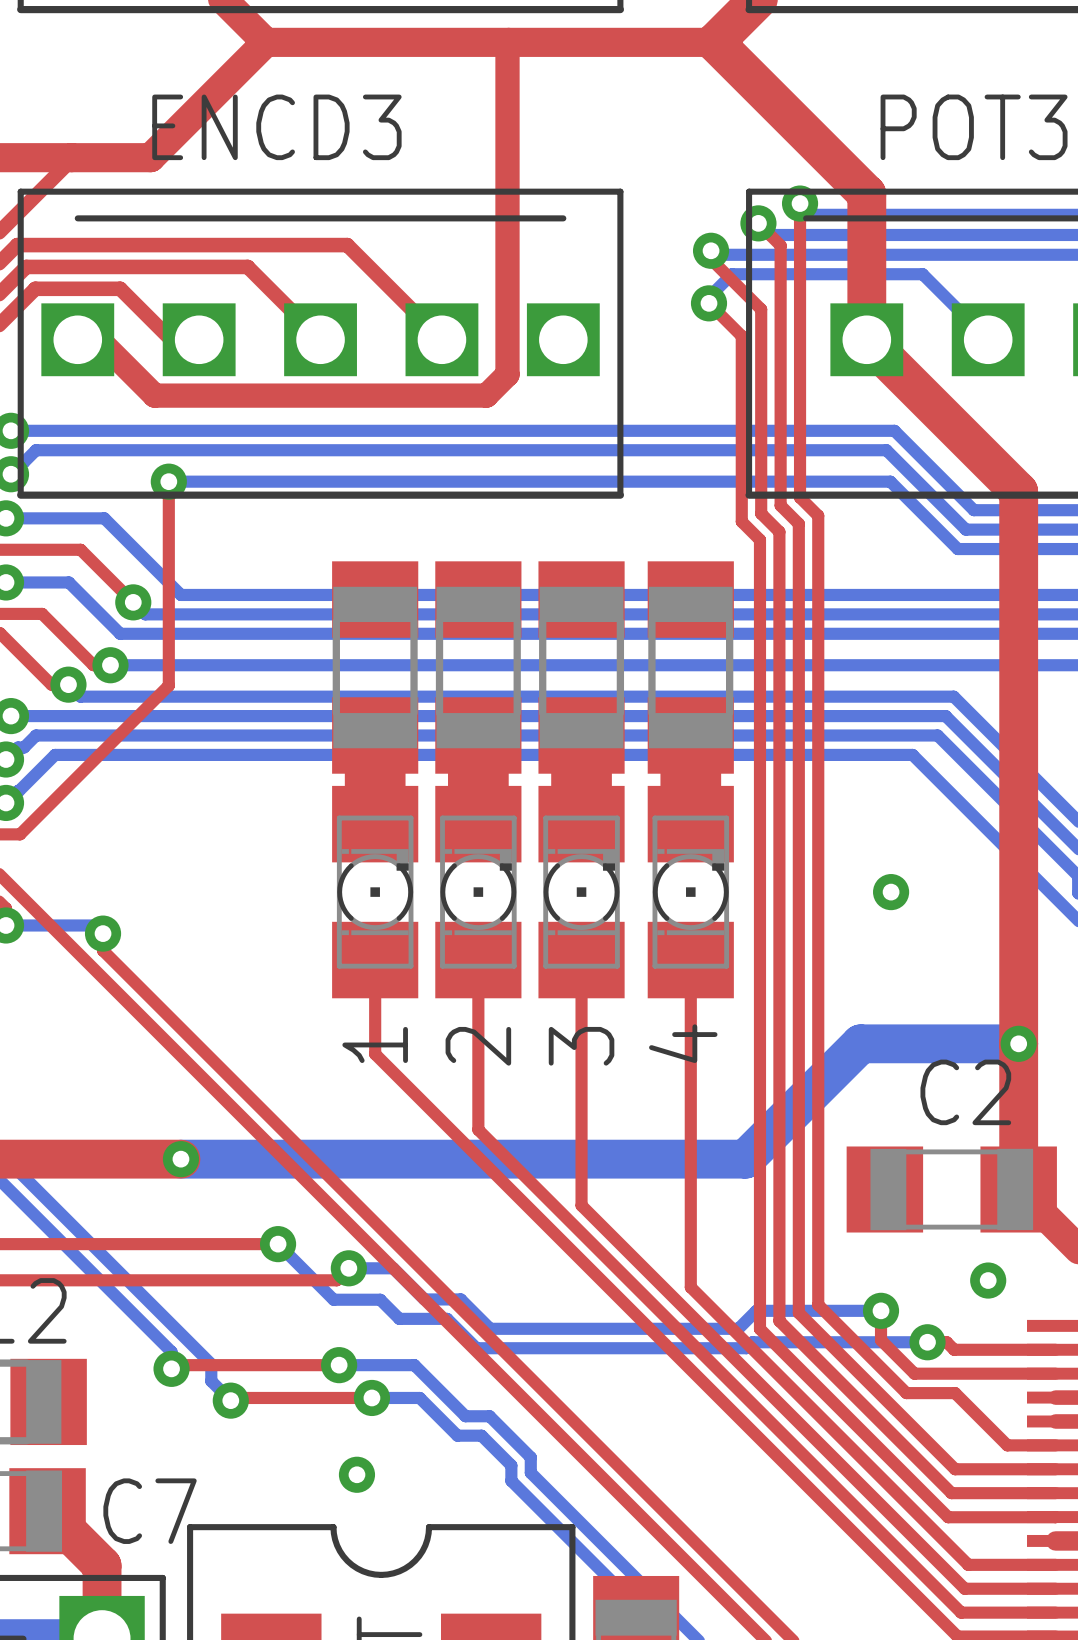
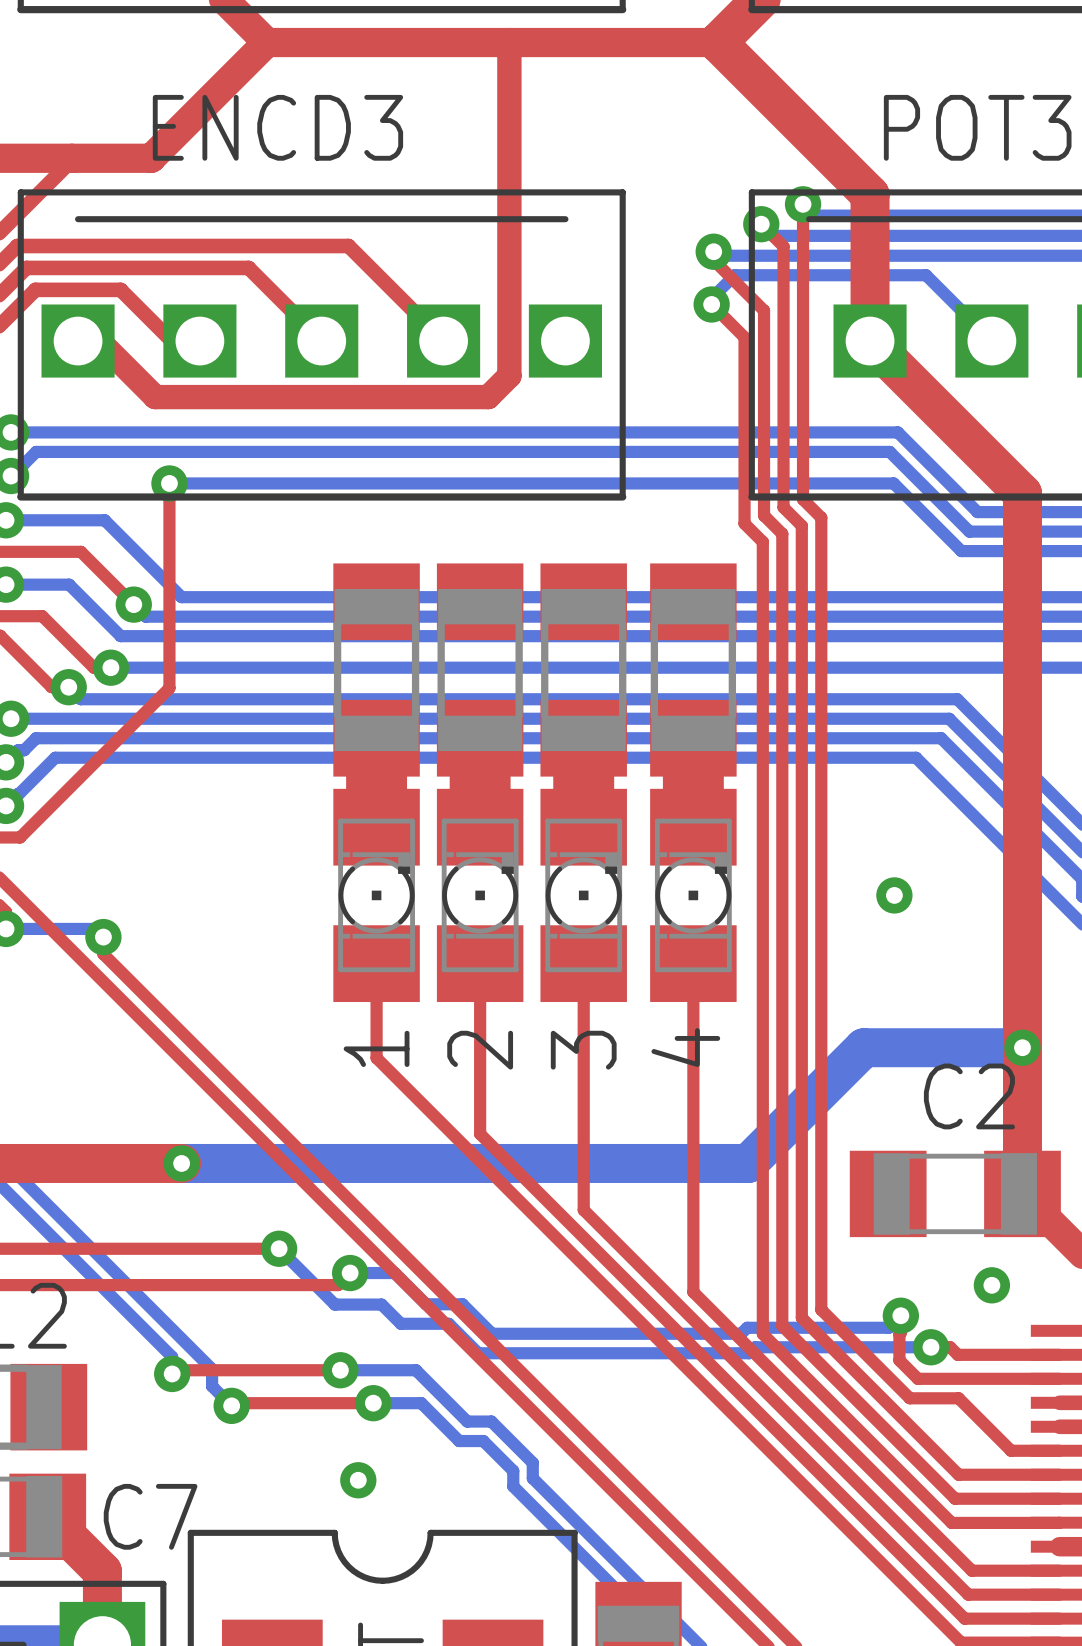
top track: (881, 1310) (881, 1340) (896, 1355) -> (900, 1315) (899, 1360)
bottom track: (881, 1310) (756, 1310) (744, 1322) -> (900, 1315) (888, 1327) (747, 1327)
via position: (881, 1310) -> (900, 1315)

